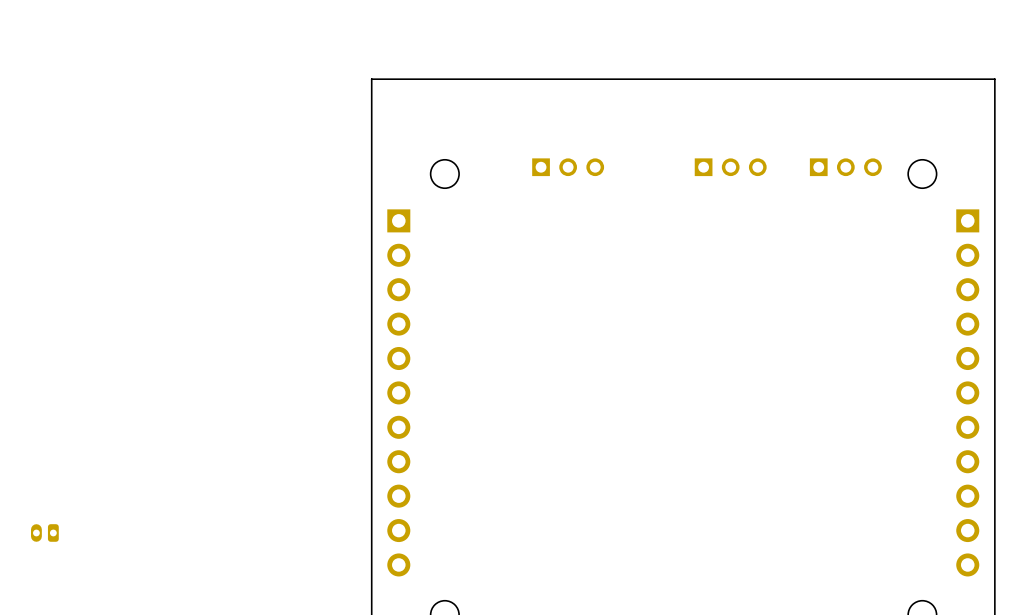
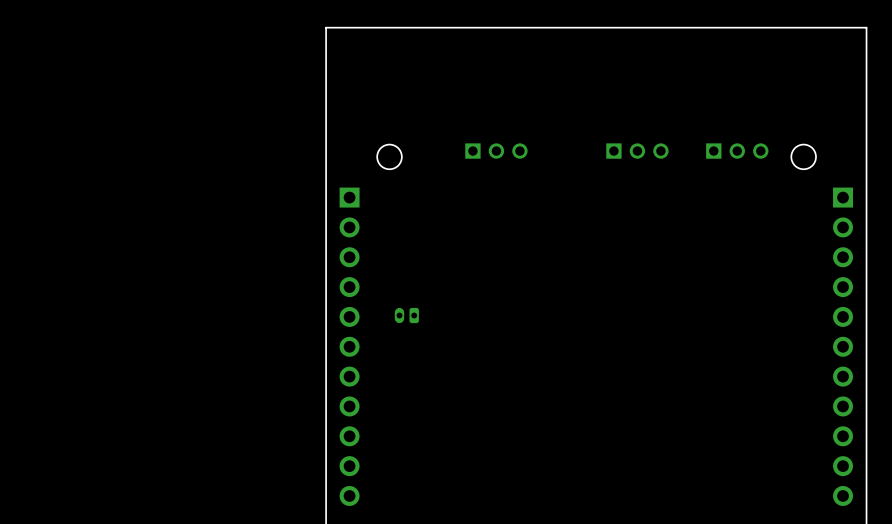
board edge: (994, 79) (371, 79) -> (866, 74) (866, 27) (326, 27) (326, 74)
part: none -> (406, 315)
part: (44, 532) -> none

